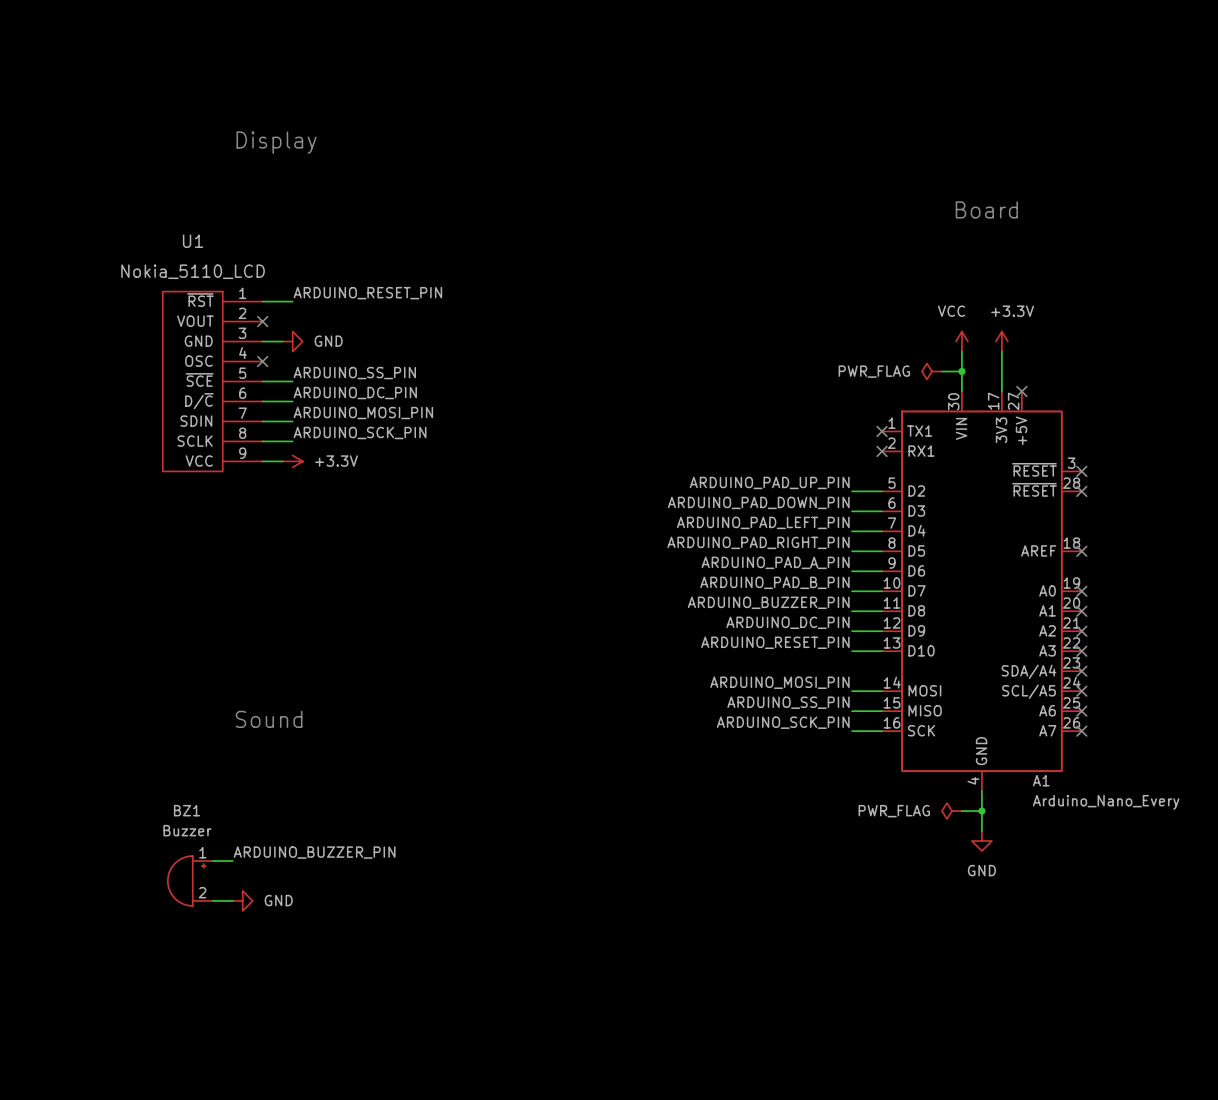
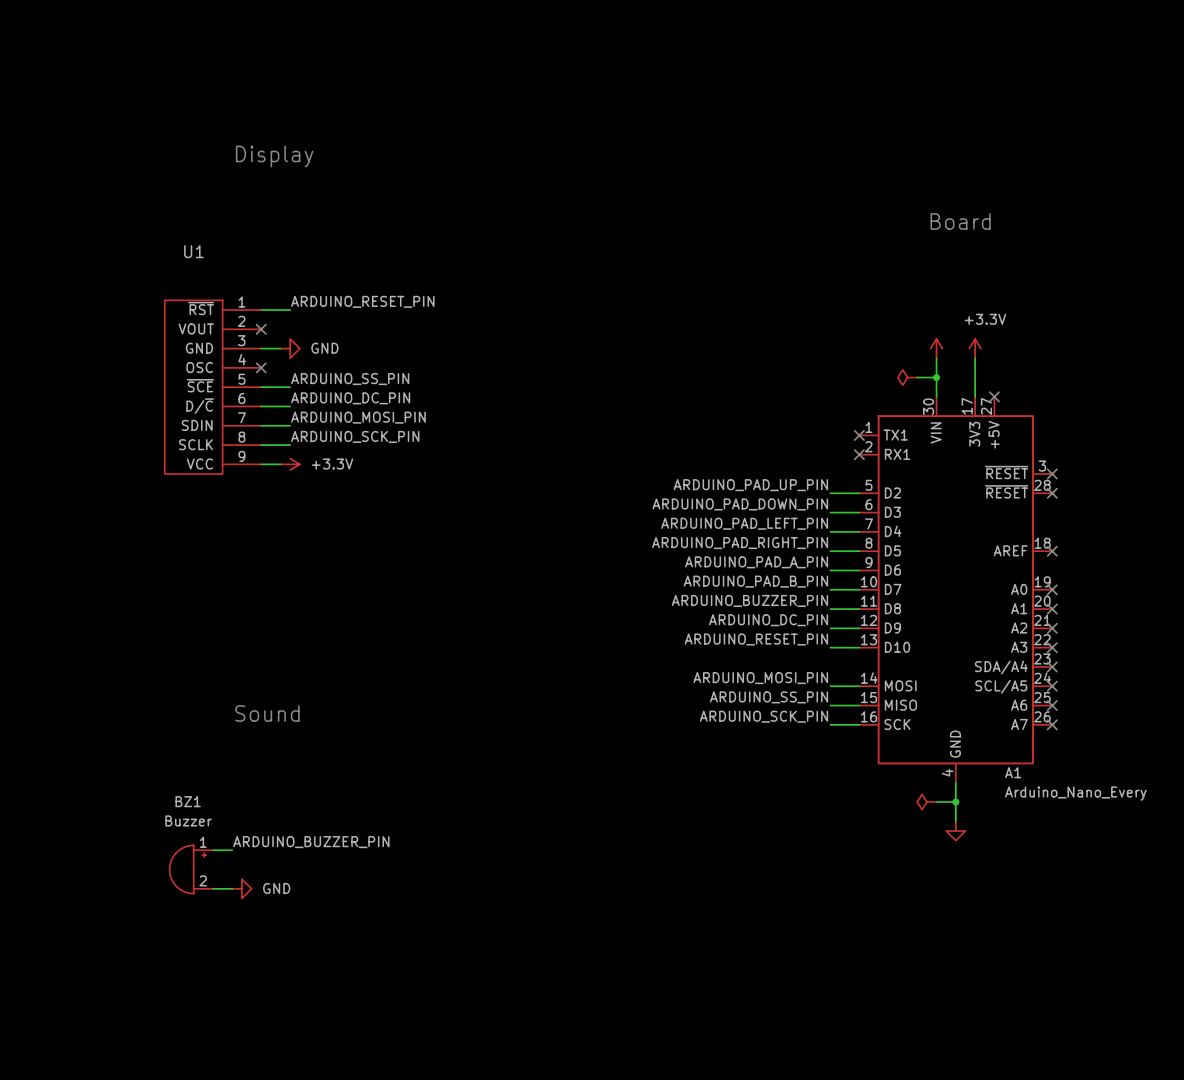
U1 value: Nokia_5110_LCD (193, 271) -> none
power symbol text: VCC (951, 311) -> none
power symbol text: PWR_FLAG (874, 371) -> none
power symbol text: PWR_FLAG (894, 811) -> none
power symbol text: GND (981, 870) -> none

